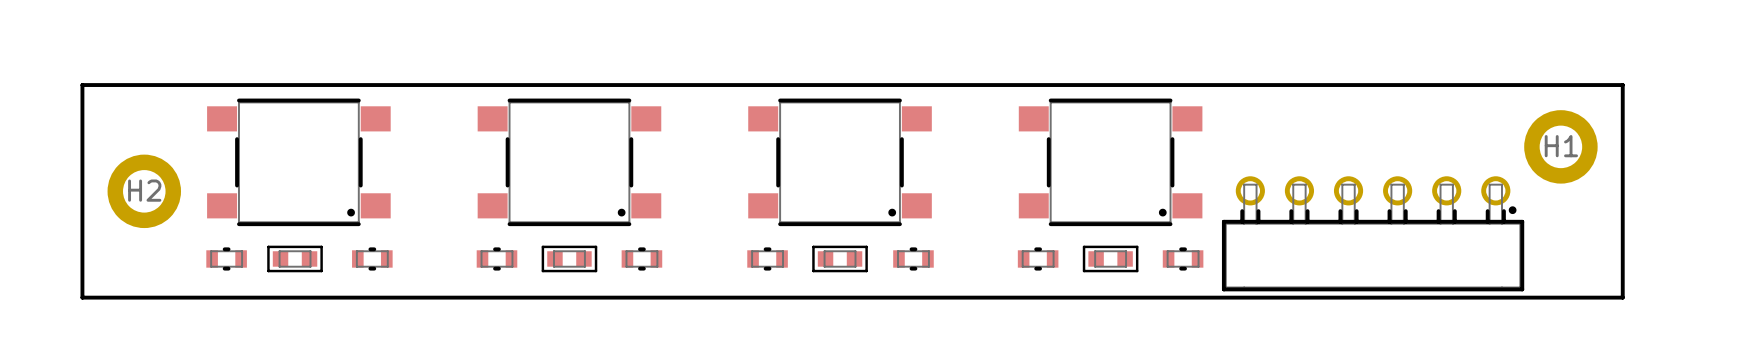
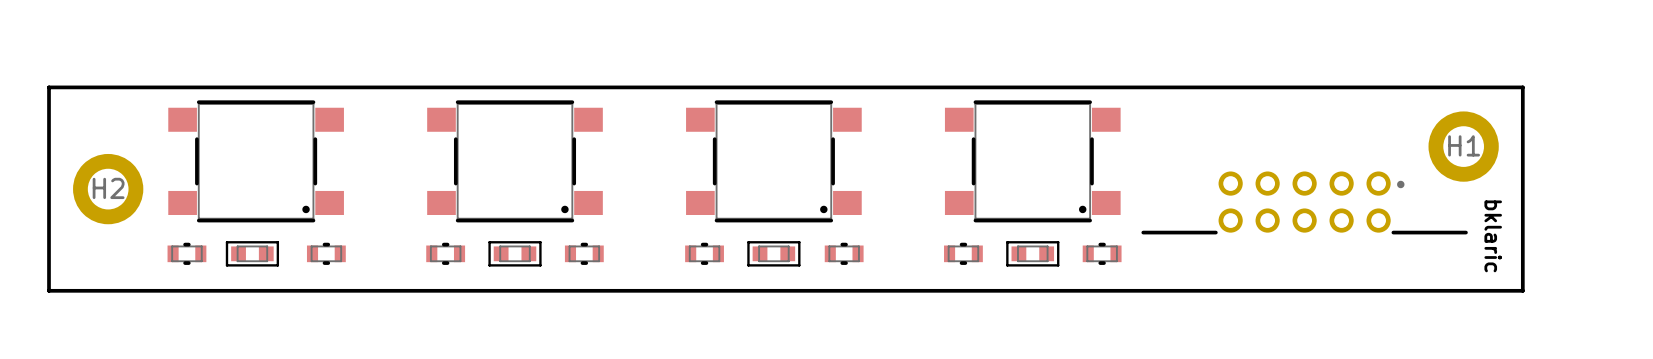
part: none -> (1304, 202)
part: (1373, 233) -> none
text: none -> bklaric (1493, 236)

